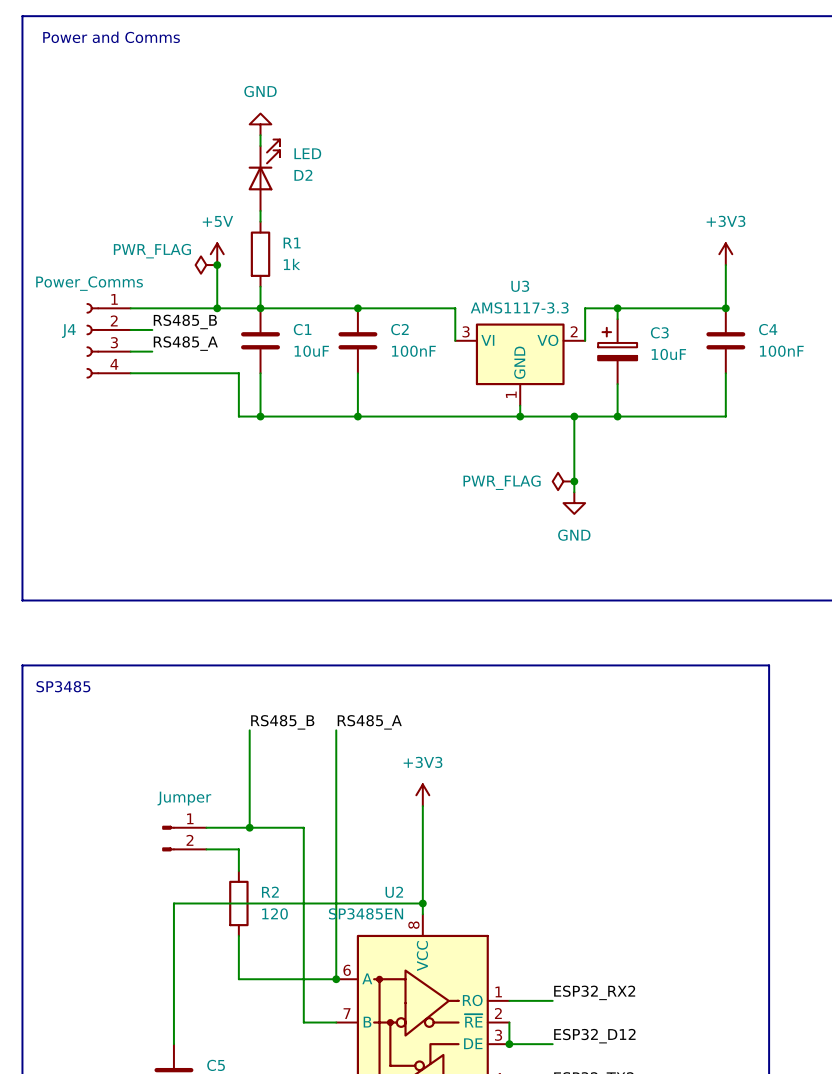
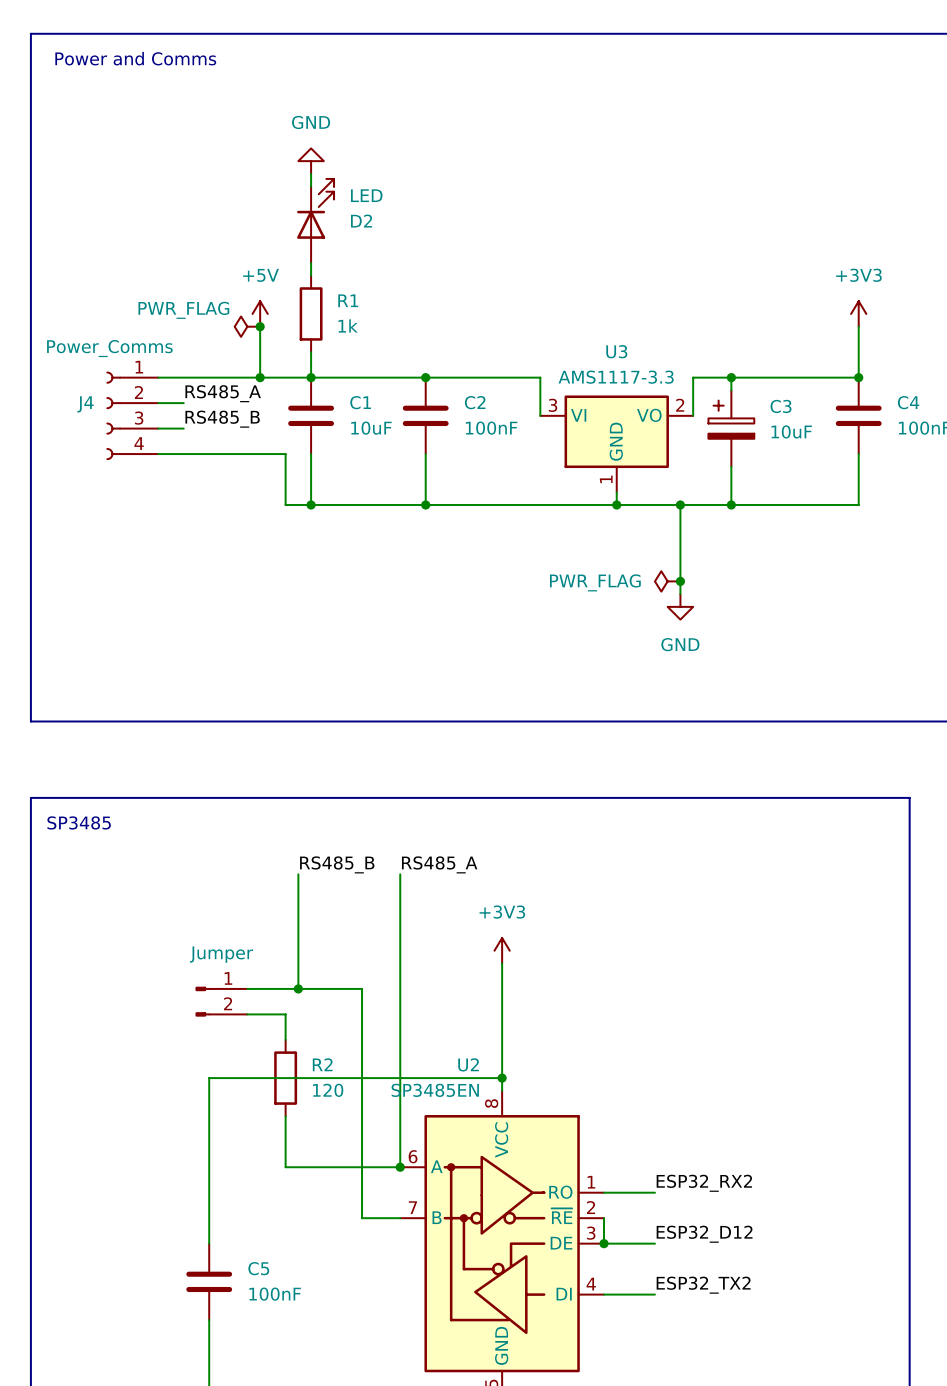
label: RS485_B (185, 321) -> RS485_A (223, 393)
label: RS485_A (185, 343) -> RS485_B (222, 419)

